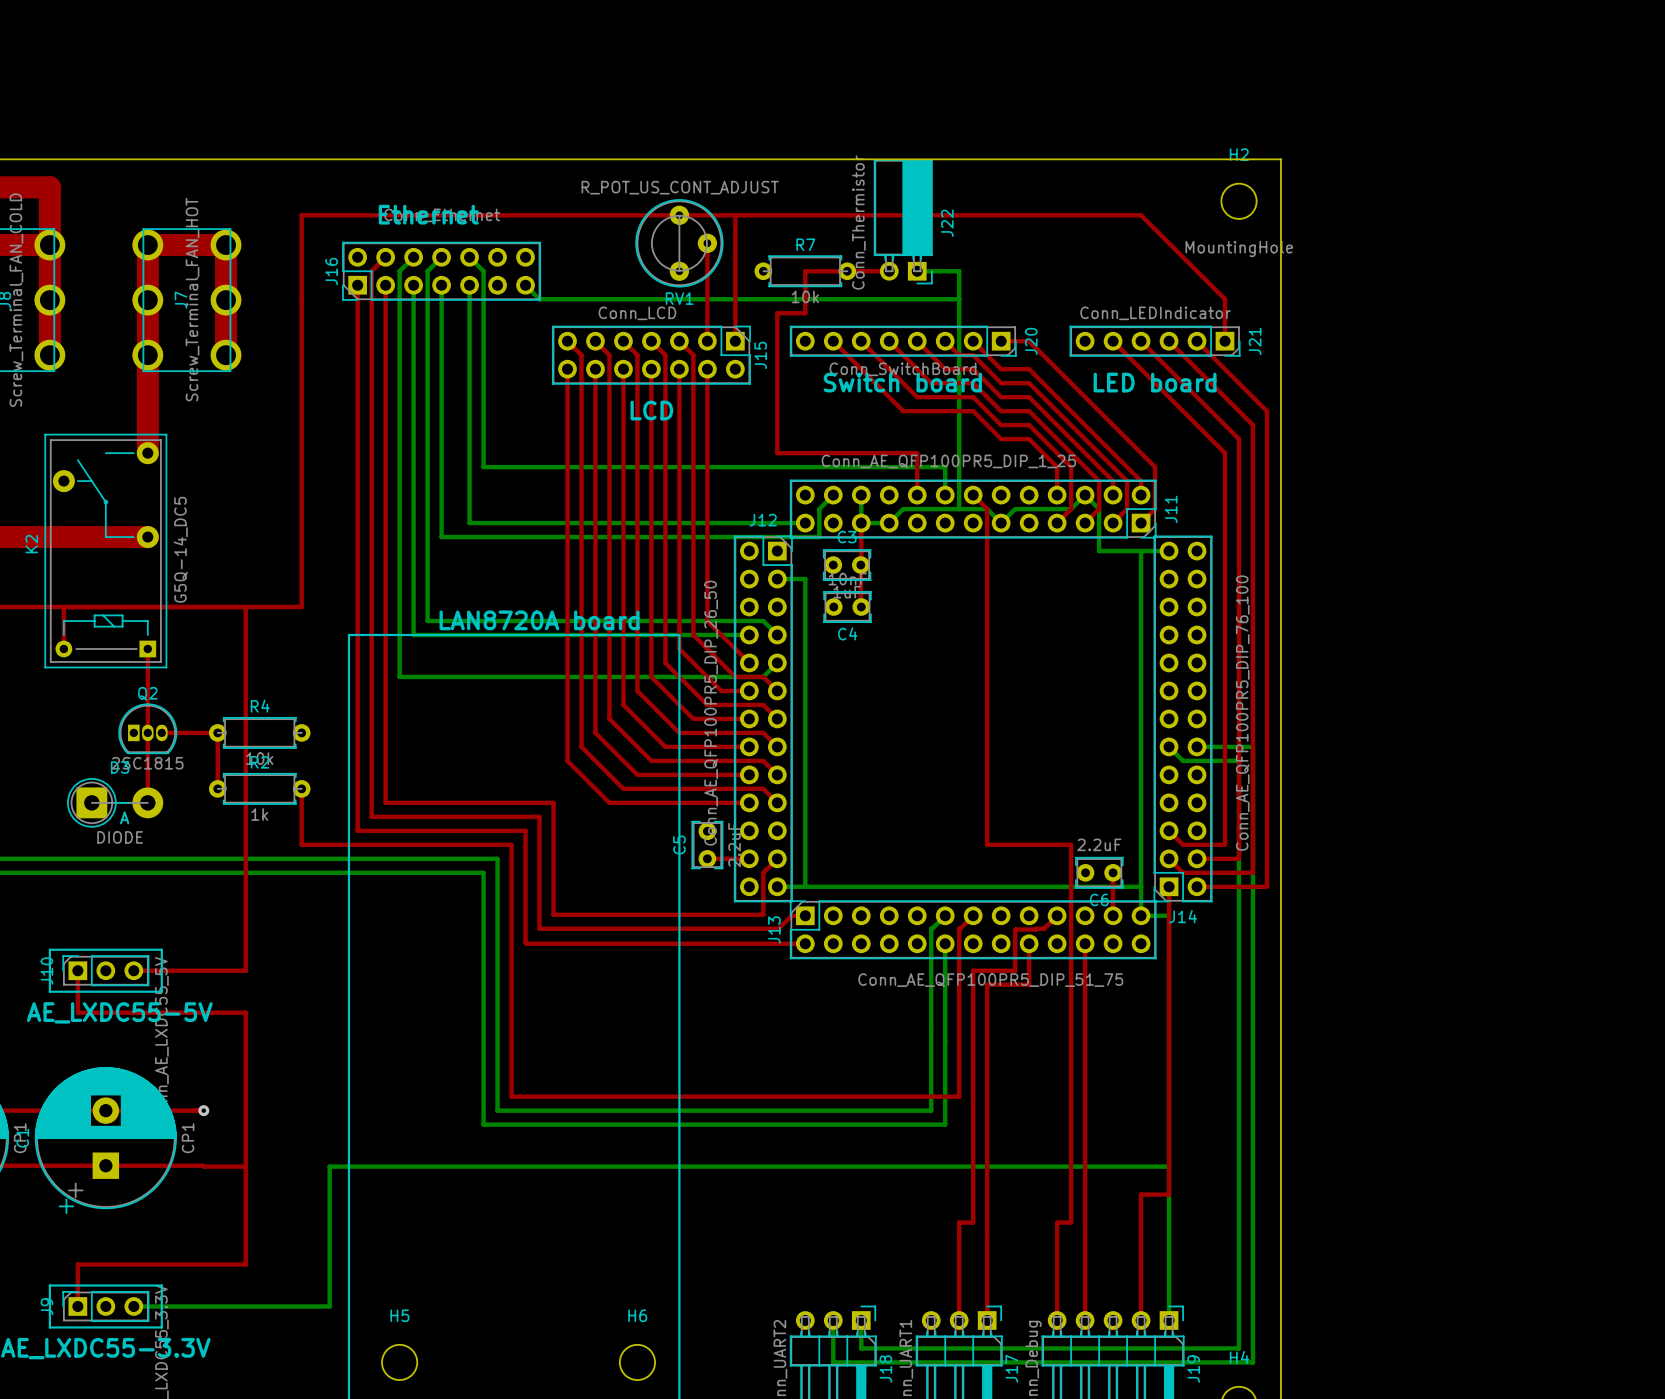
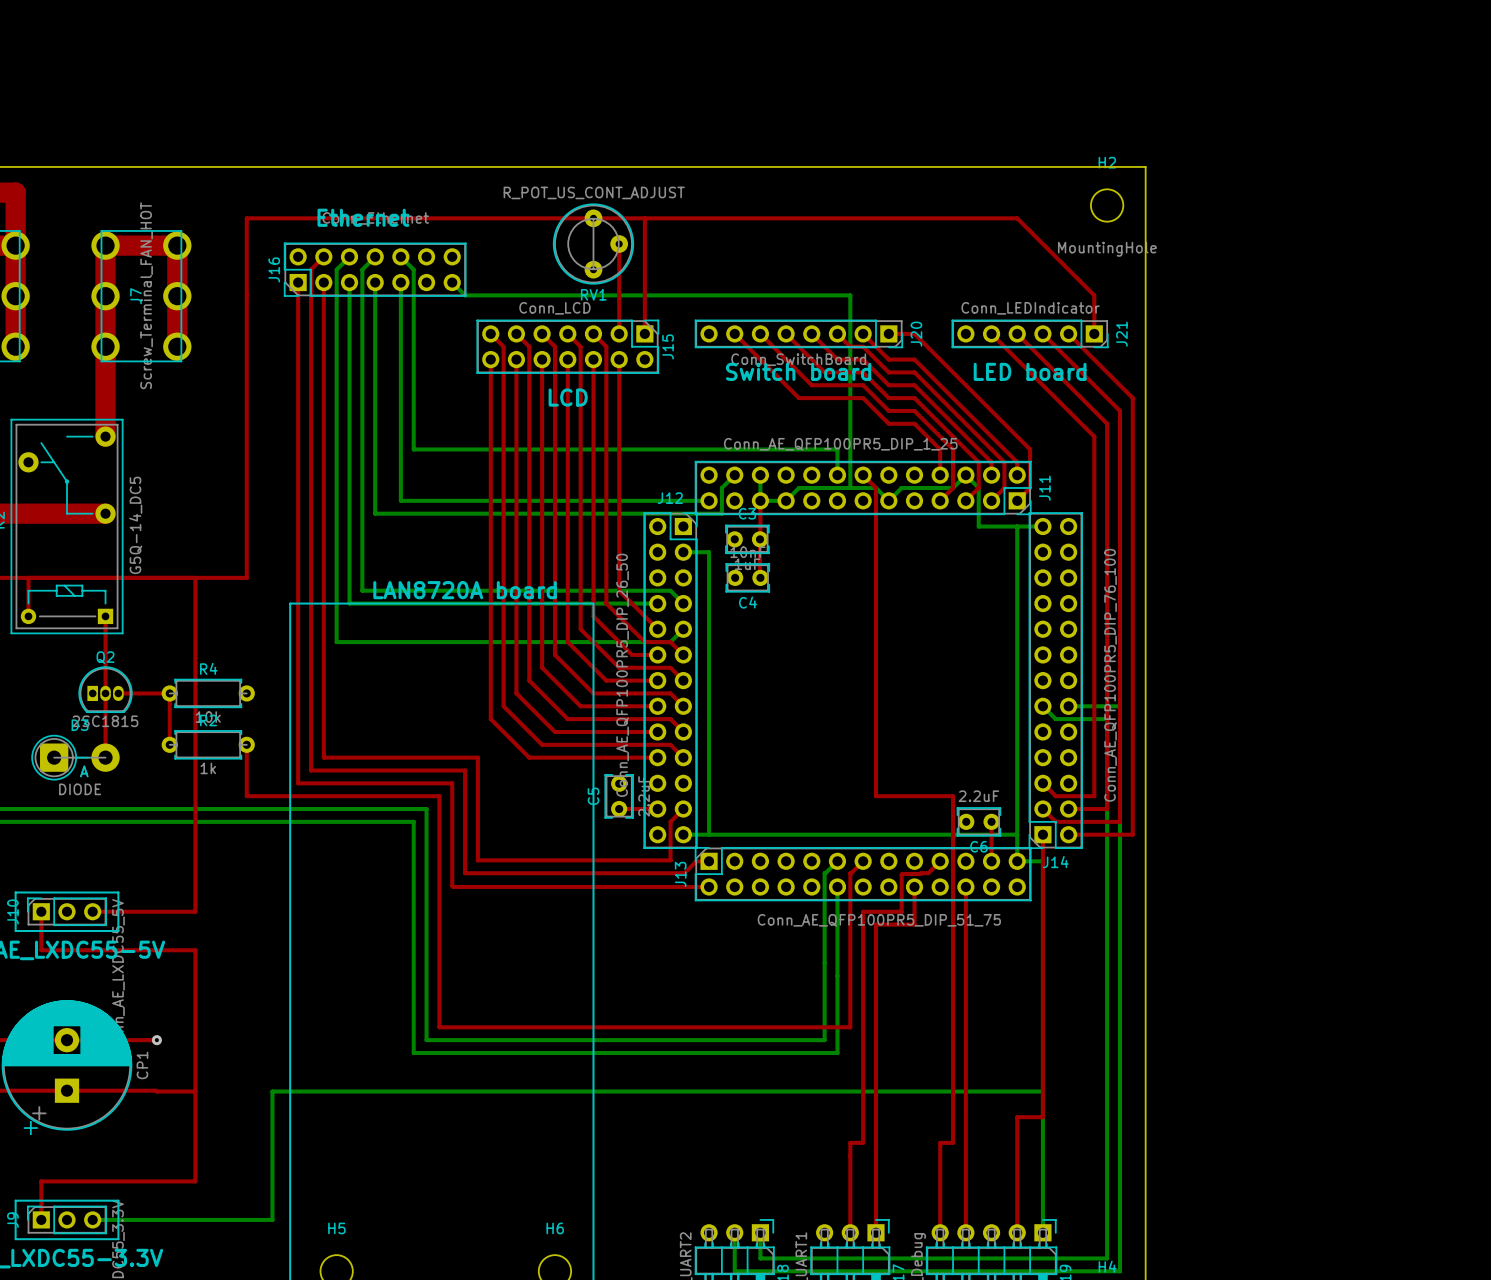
J22: Conn_Thermistor (903, 221) -> none
R7: 10k (805, 271) -> none
top track: (889, 271) (805, 271) (805, 313) (777, 313) (777, 453) (917, 453) (917, 495) -> none
bottom track: (917, 271) (959, 271) (959, 299) -> none

